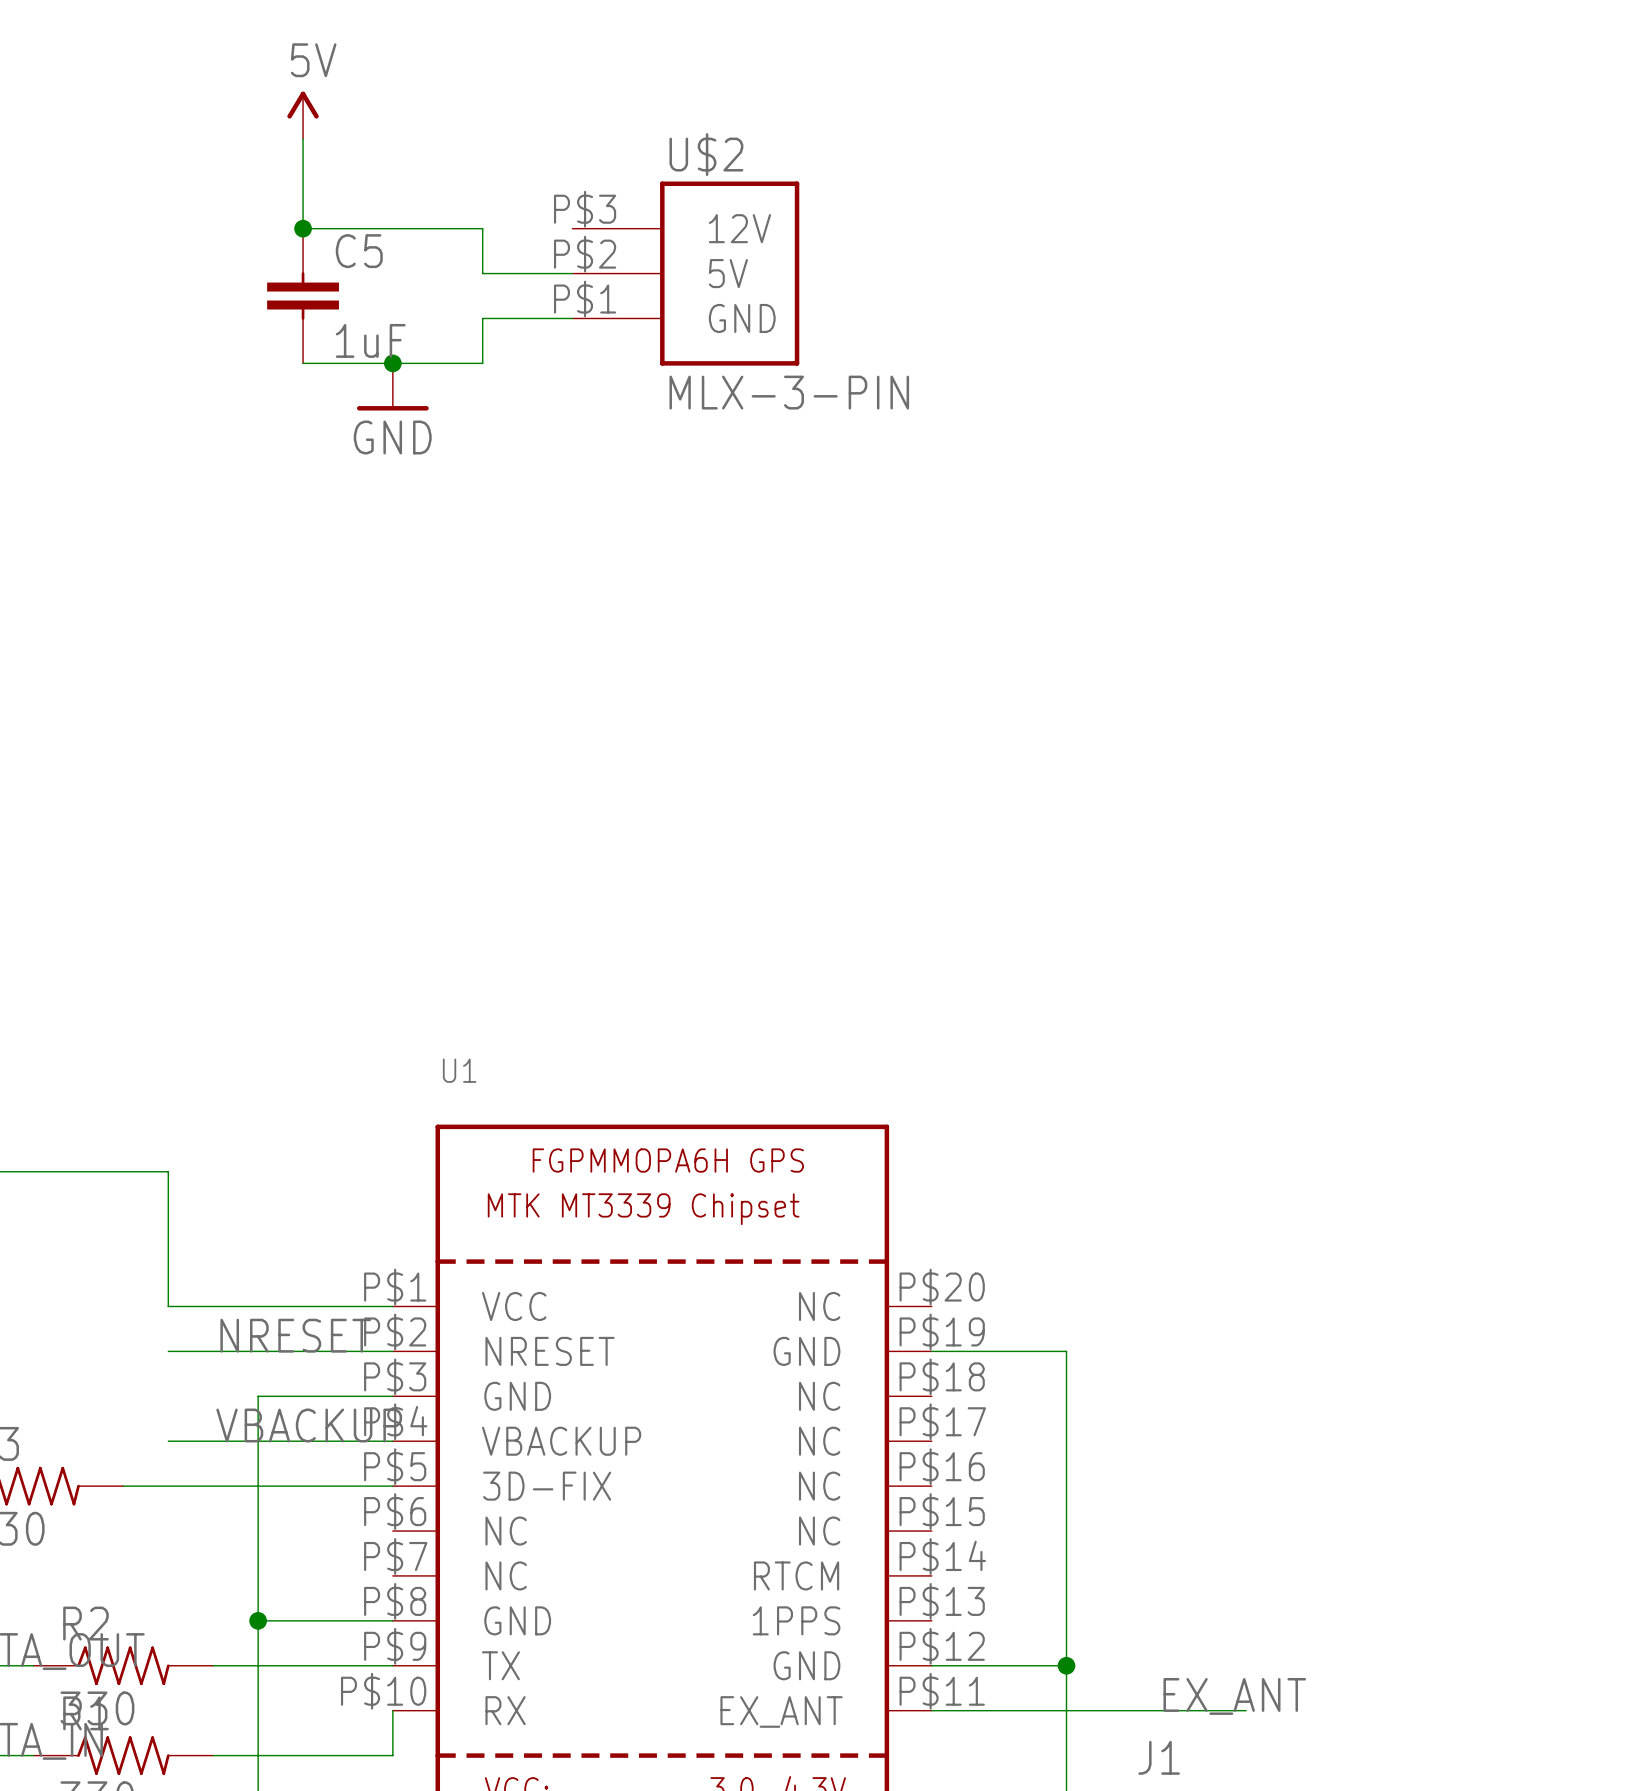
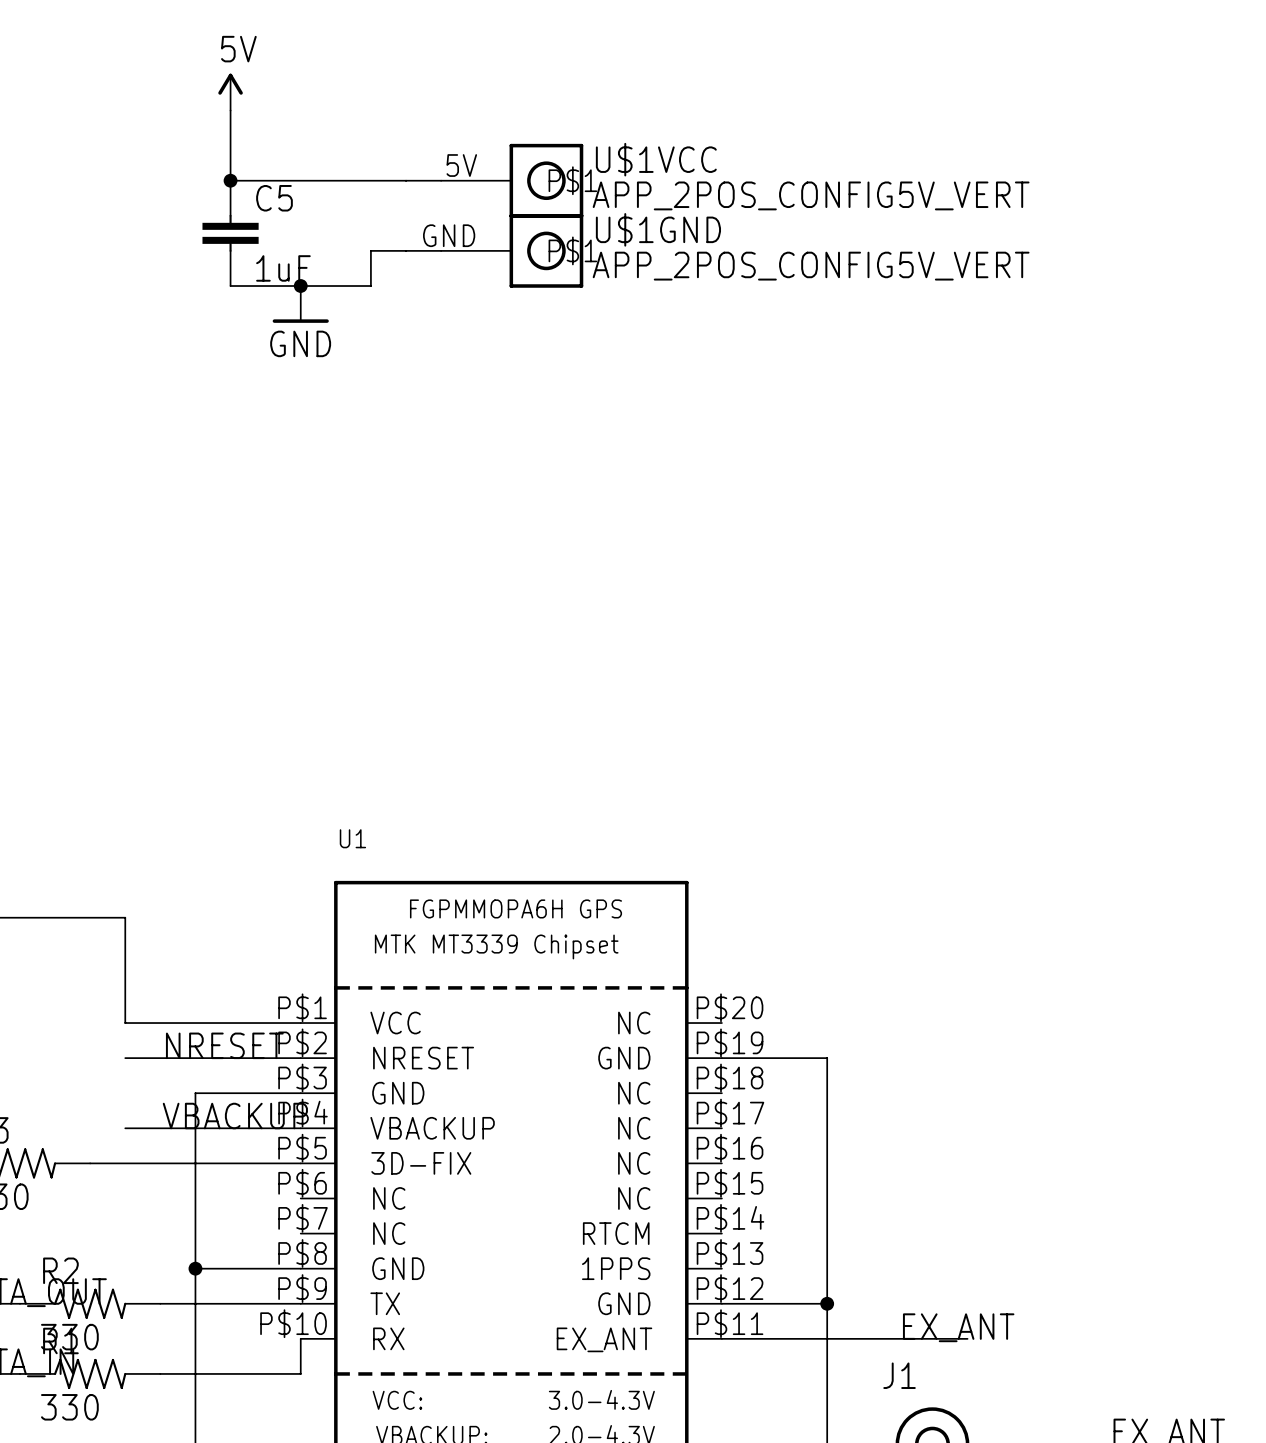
wire: (482, 228) (482, 273) (572, 273) -> (370, 180) (441, 180)
U$1VCC: none -> APP_2POS_CONFIG5V_VERT (512, 180)
U$2: MLX-3-PIN (685, 273) -> none
U$1GND: none -> APP_2POS_CONFIG5V_VERT (512, 250)

